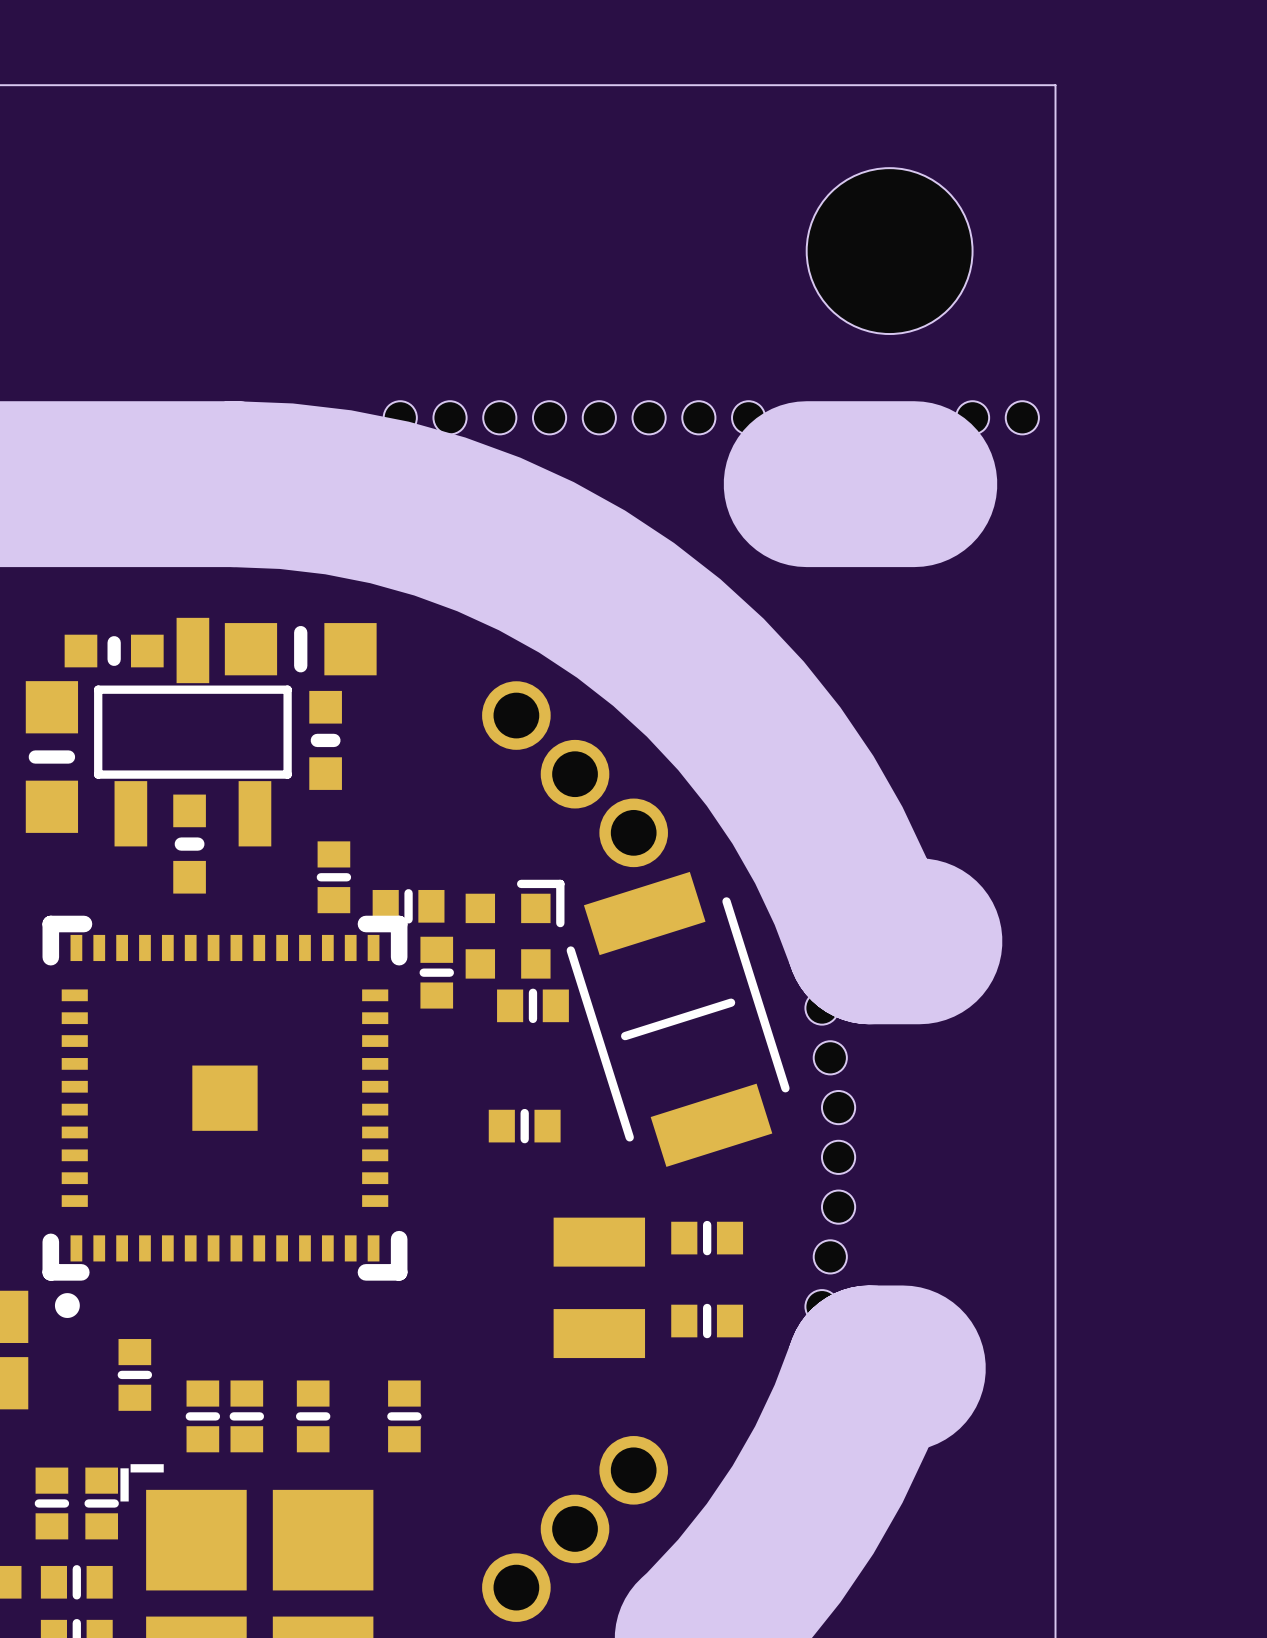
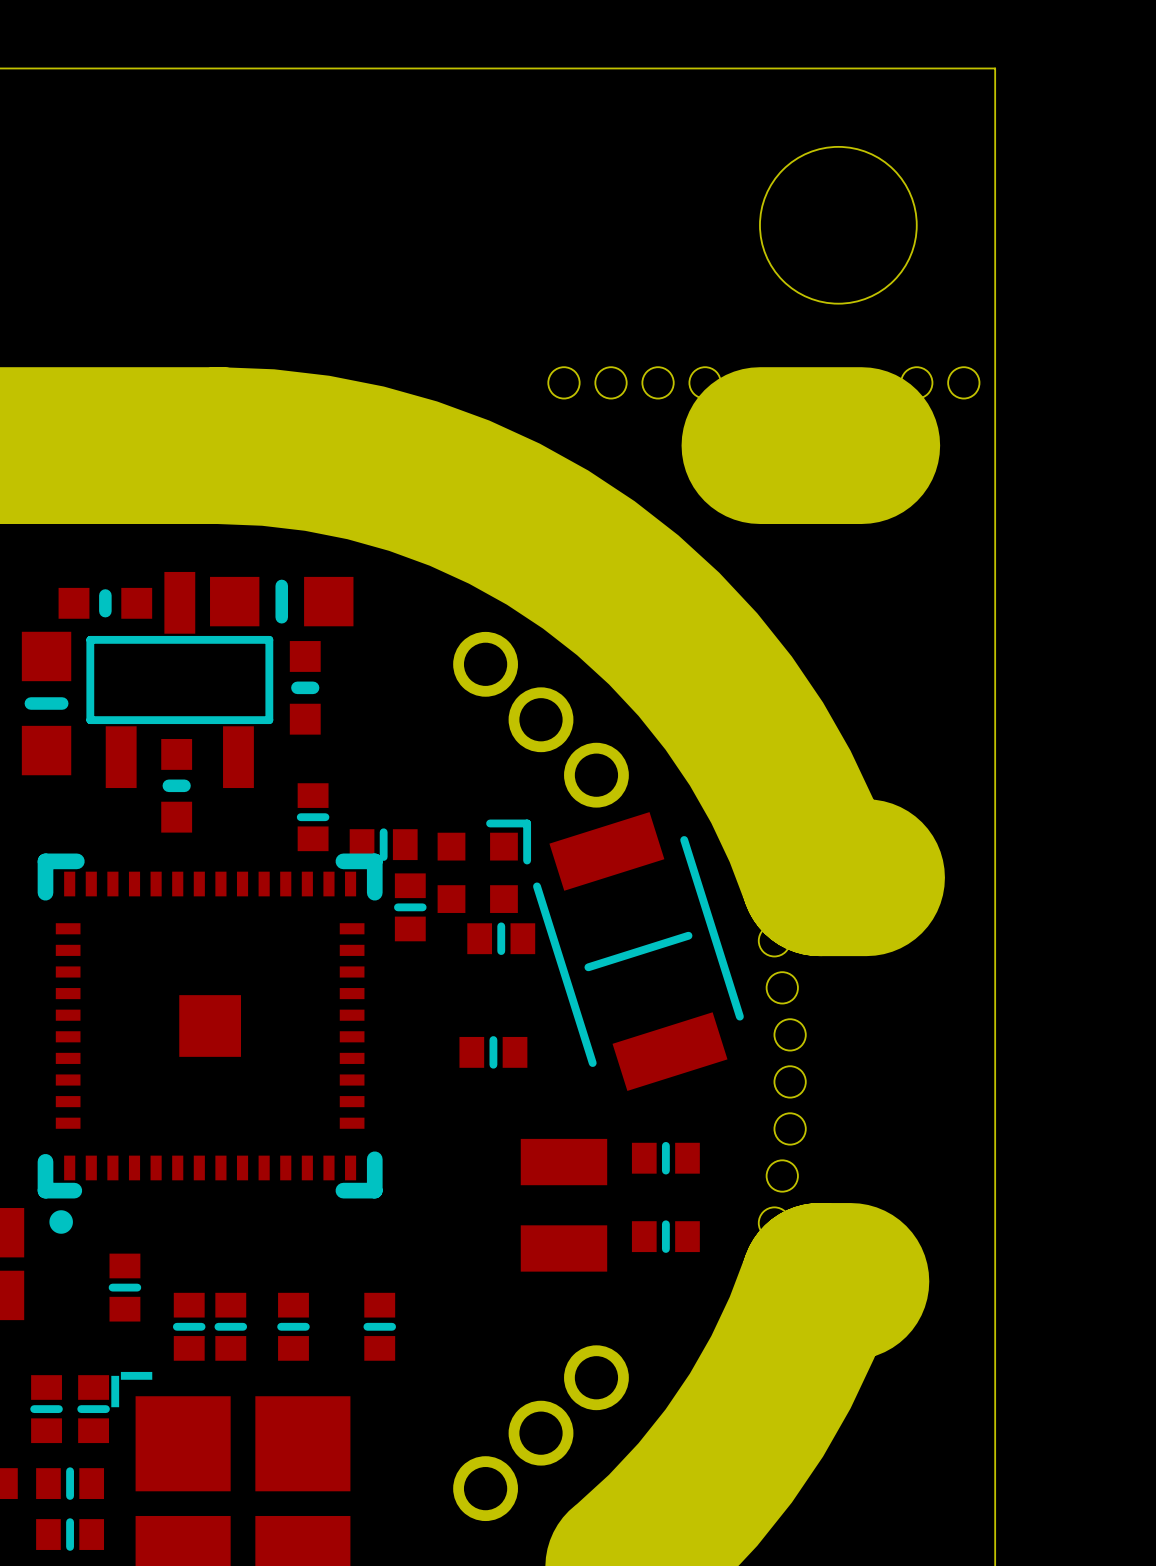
hole: (400, 417) -> none
hole: (450, 417) -> none
hole: (499, 417) -> none
hole: (549, 417) -> none

